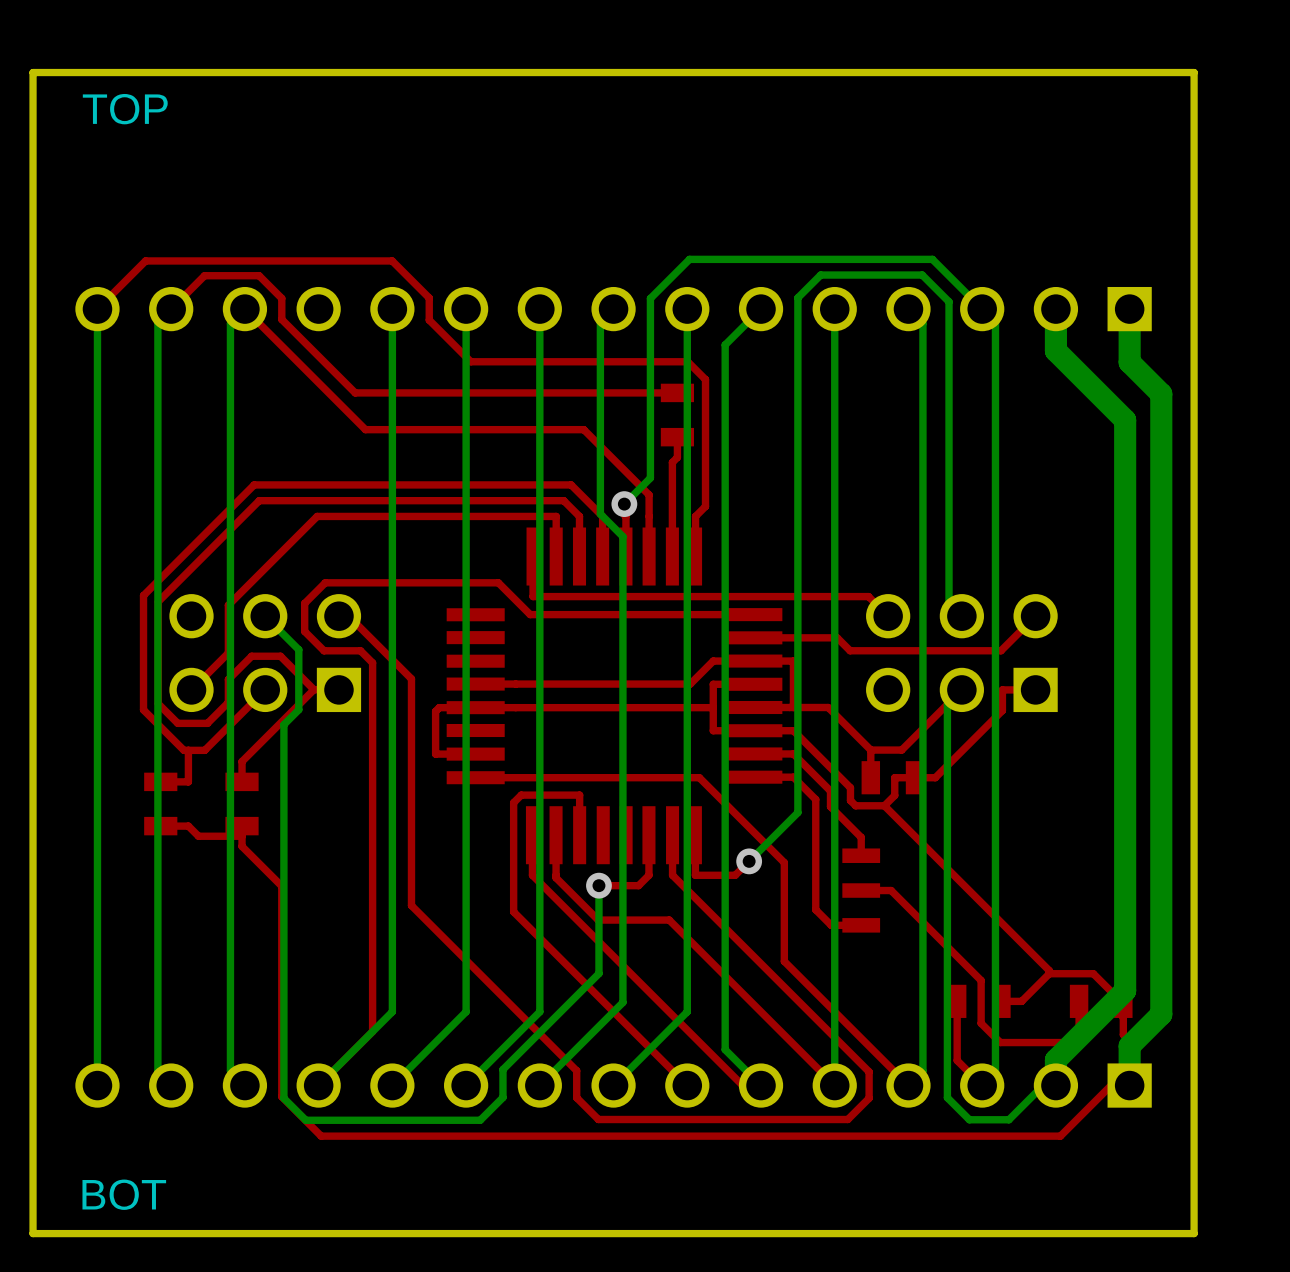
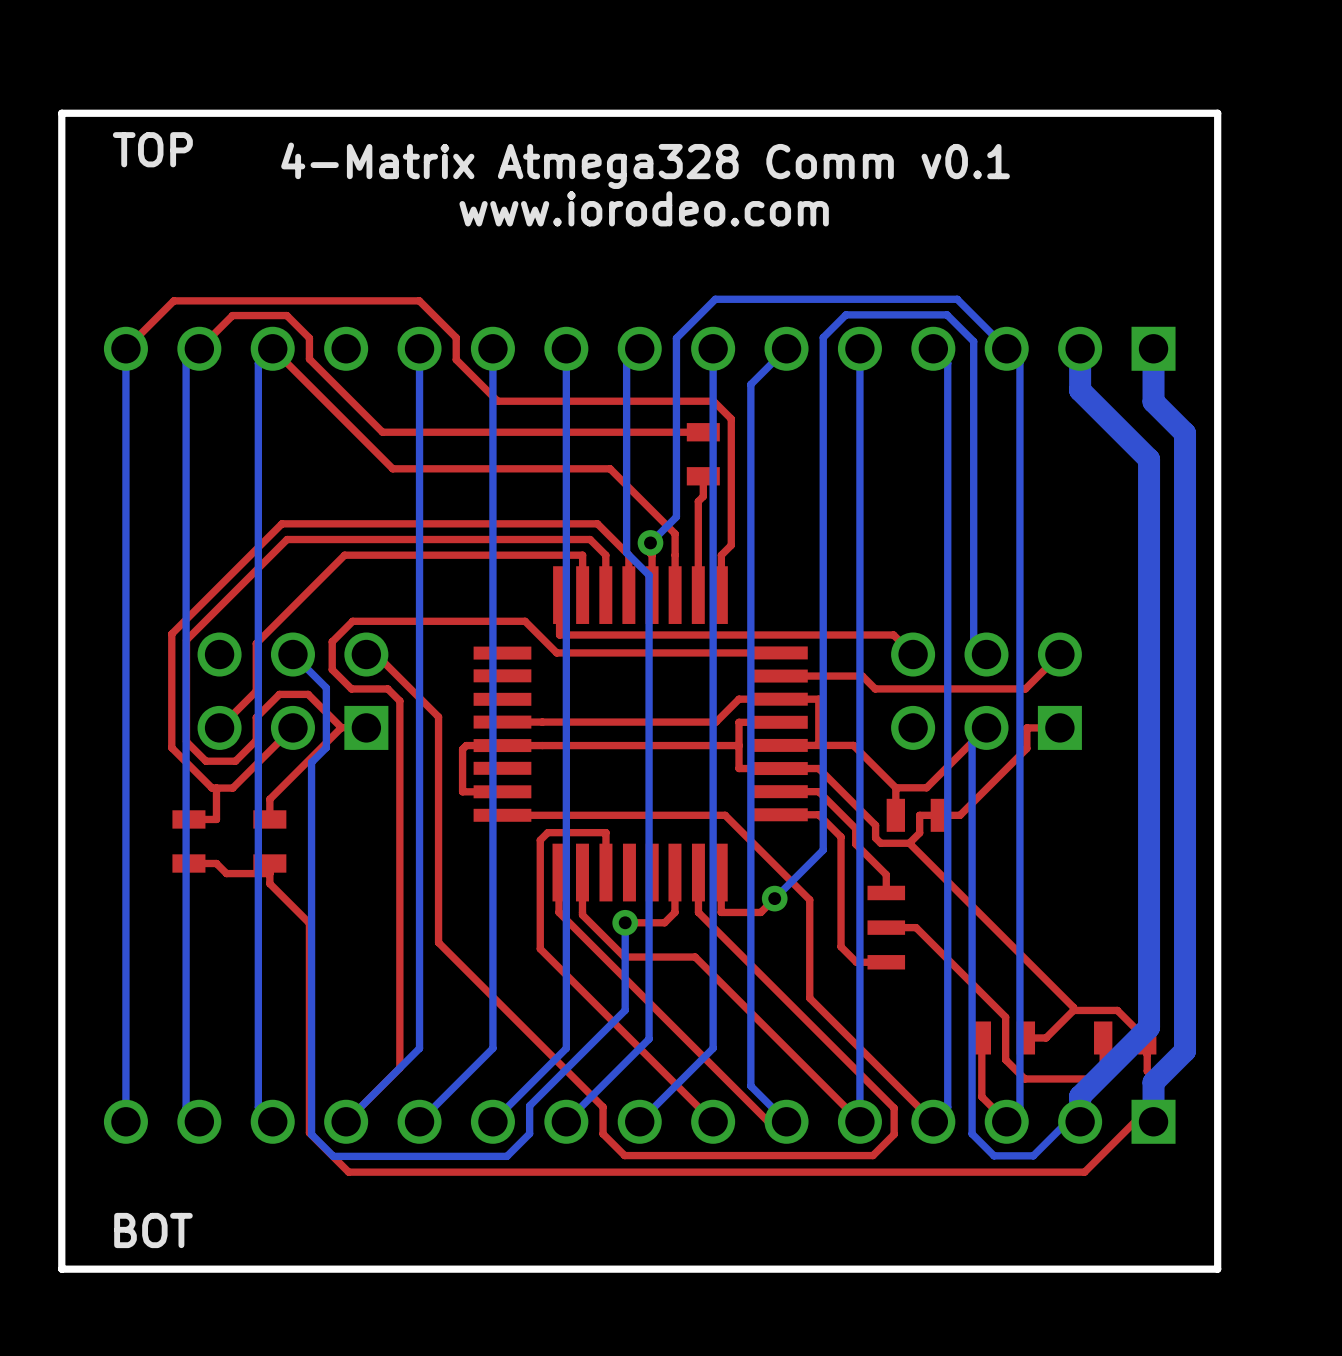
text: none -> 4-Matrix Atmega328 Comm v0.1 (645, 165)
text: none -> www.iorodeo.com (644, 208)

